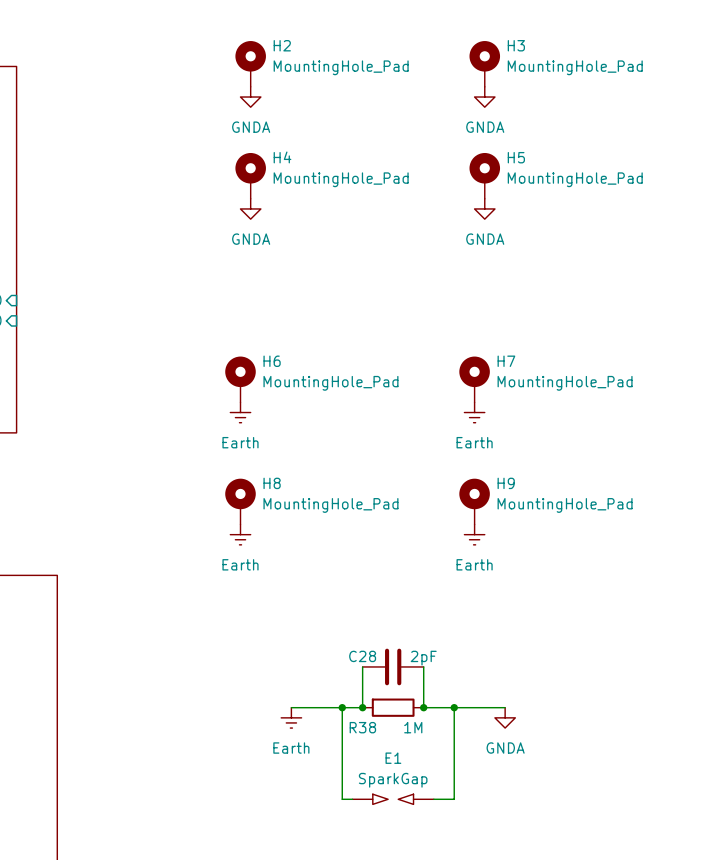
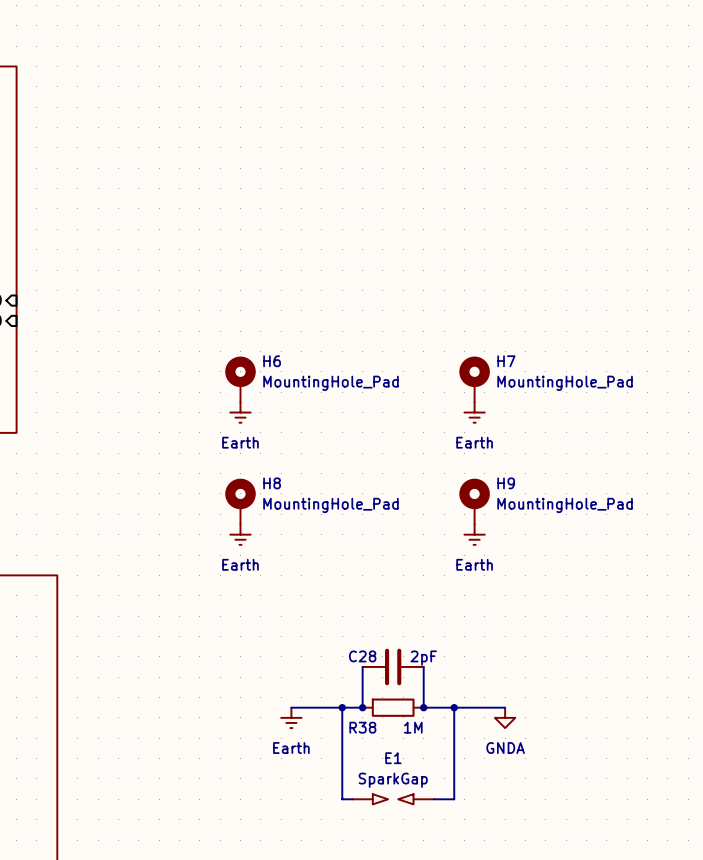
H2: MountingHole_Pad (250, 63) -> none
H3: MountingHole_Pad (484, 63) -> none
power symbol: GNDA (250, 97) -> none
power symbol: GNDA (484, 97) -> none
H4: MountingHole_Pad (250, 175) -> none
H5: MountingHole_Pad (484, 175) -> none
power symbol: GNDA (250, 208) -> none
power symbol: GNDA (484, 208) -> none

